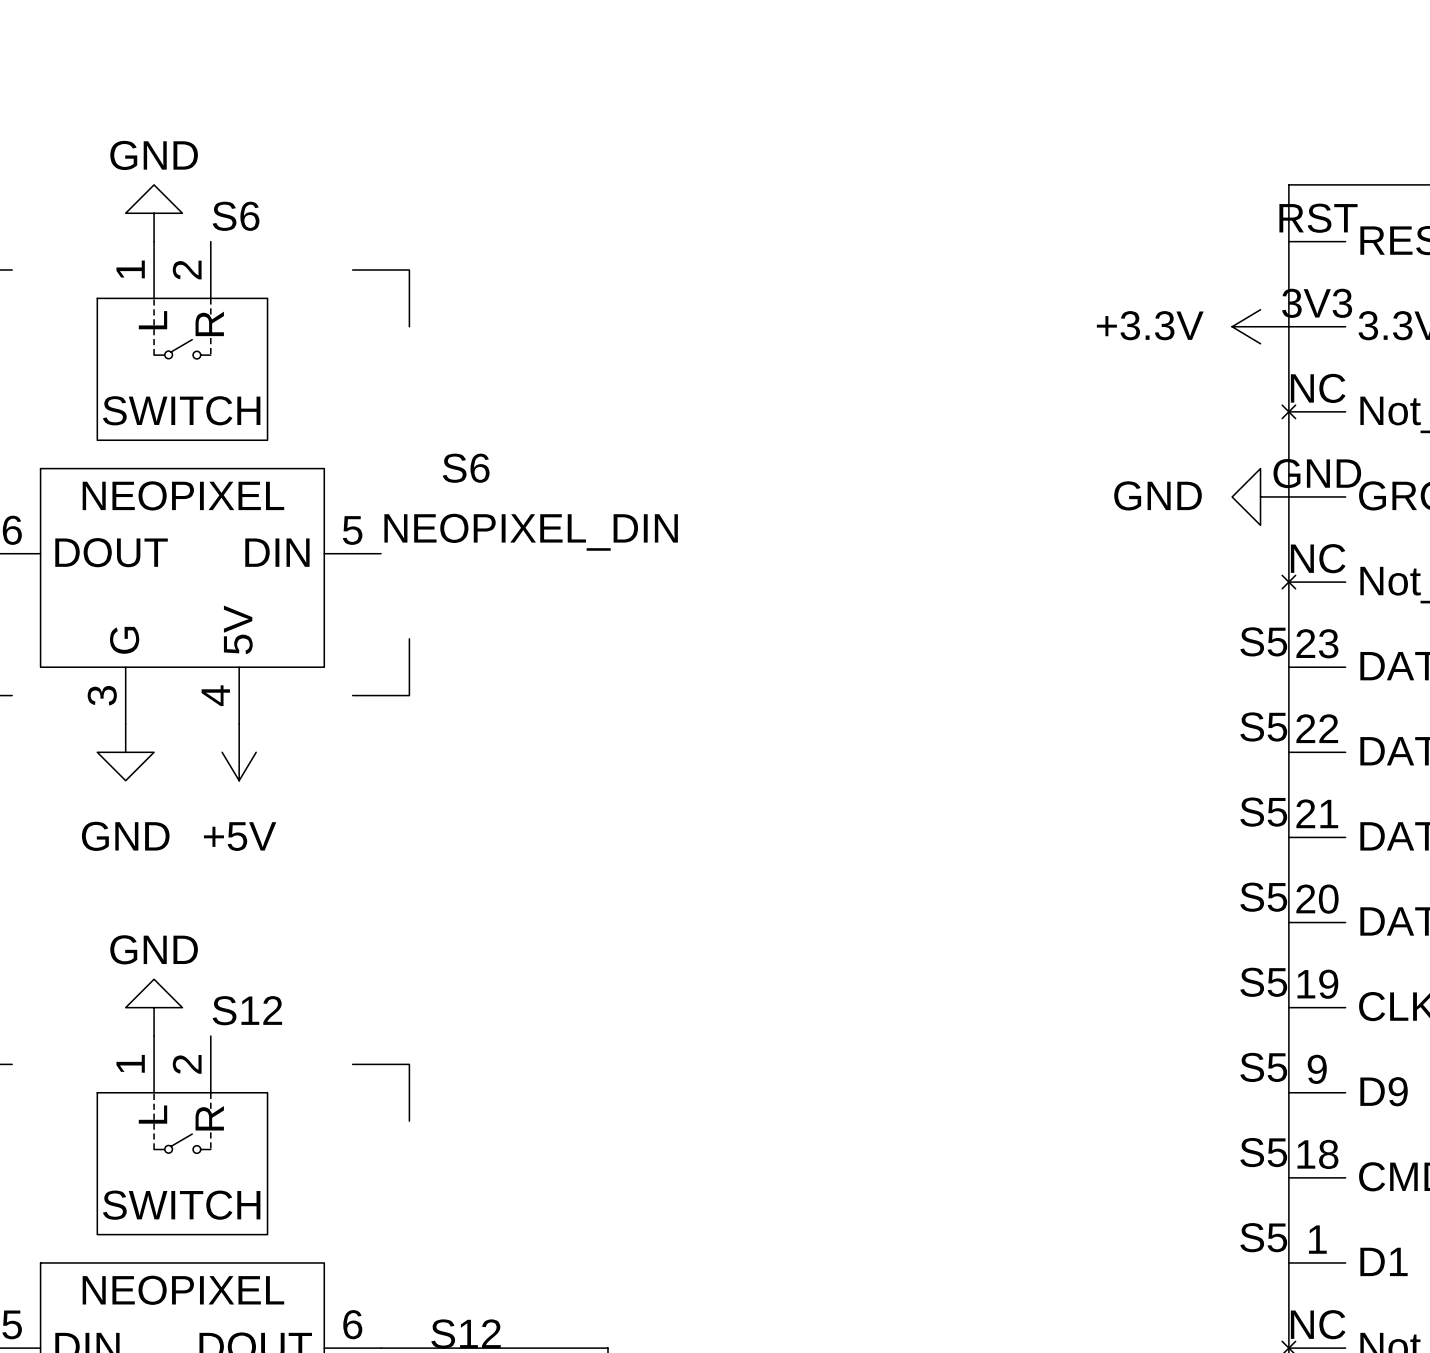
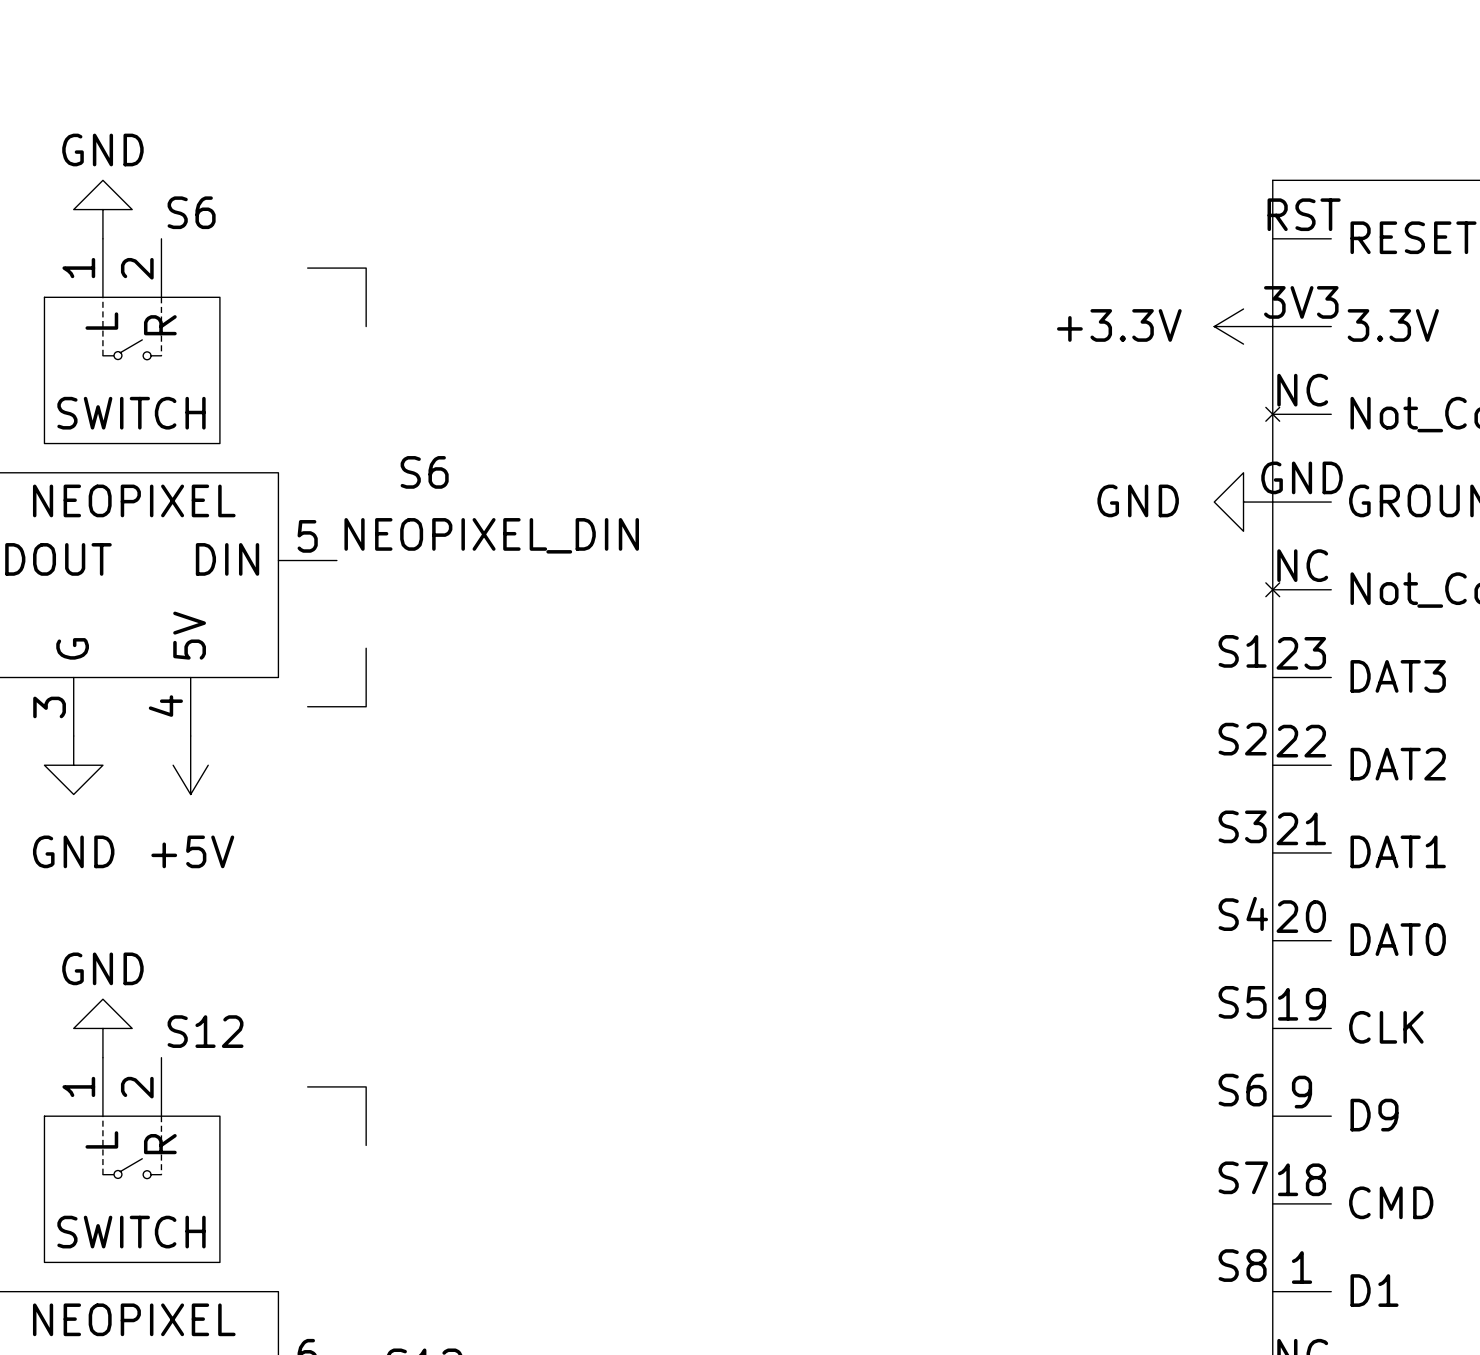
label: S5 (1263, 641) -> S1 (1242, 651)
label: S5 (1263, 726) -> S2 (1242, 739)
label: S5 (1263, 812) -> S3 (1242, 826)
label: S5 (1263, 897) -> S4 (1243, 913)
label: S5 (1263, 1067) -> S6 (1242, 1090)
label: S5 (1263, 1152) -> S7 (1243, 1177)
label: S5 (1263, 1237) -> S8 (1242, 1265)

